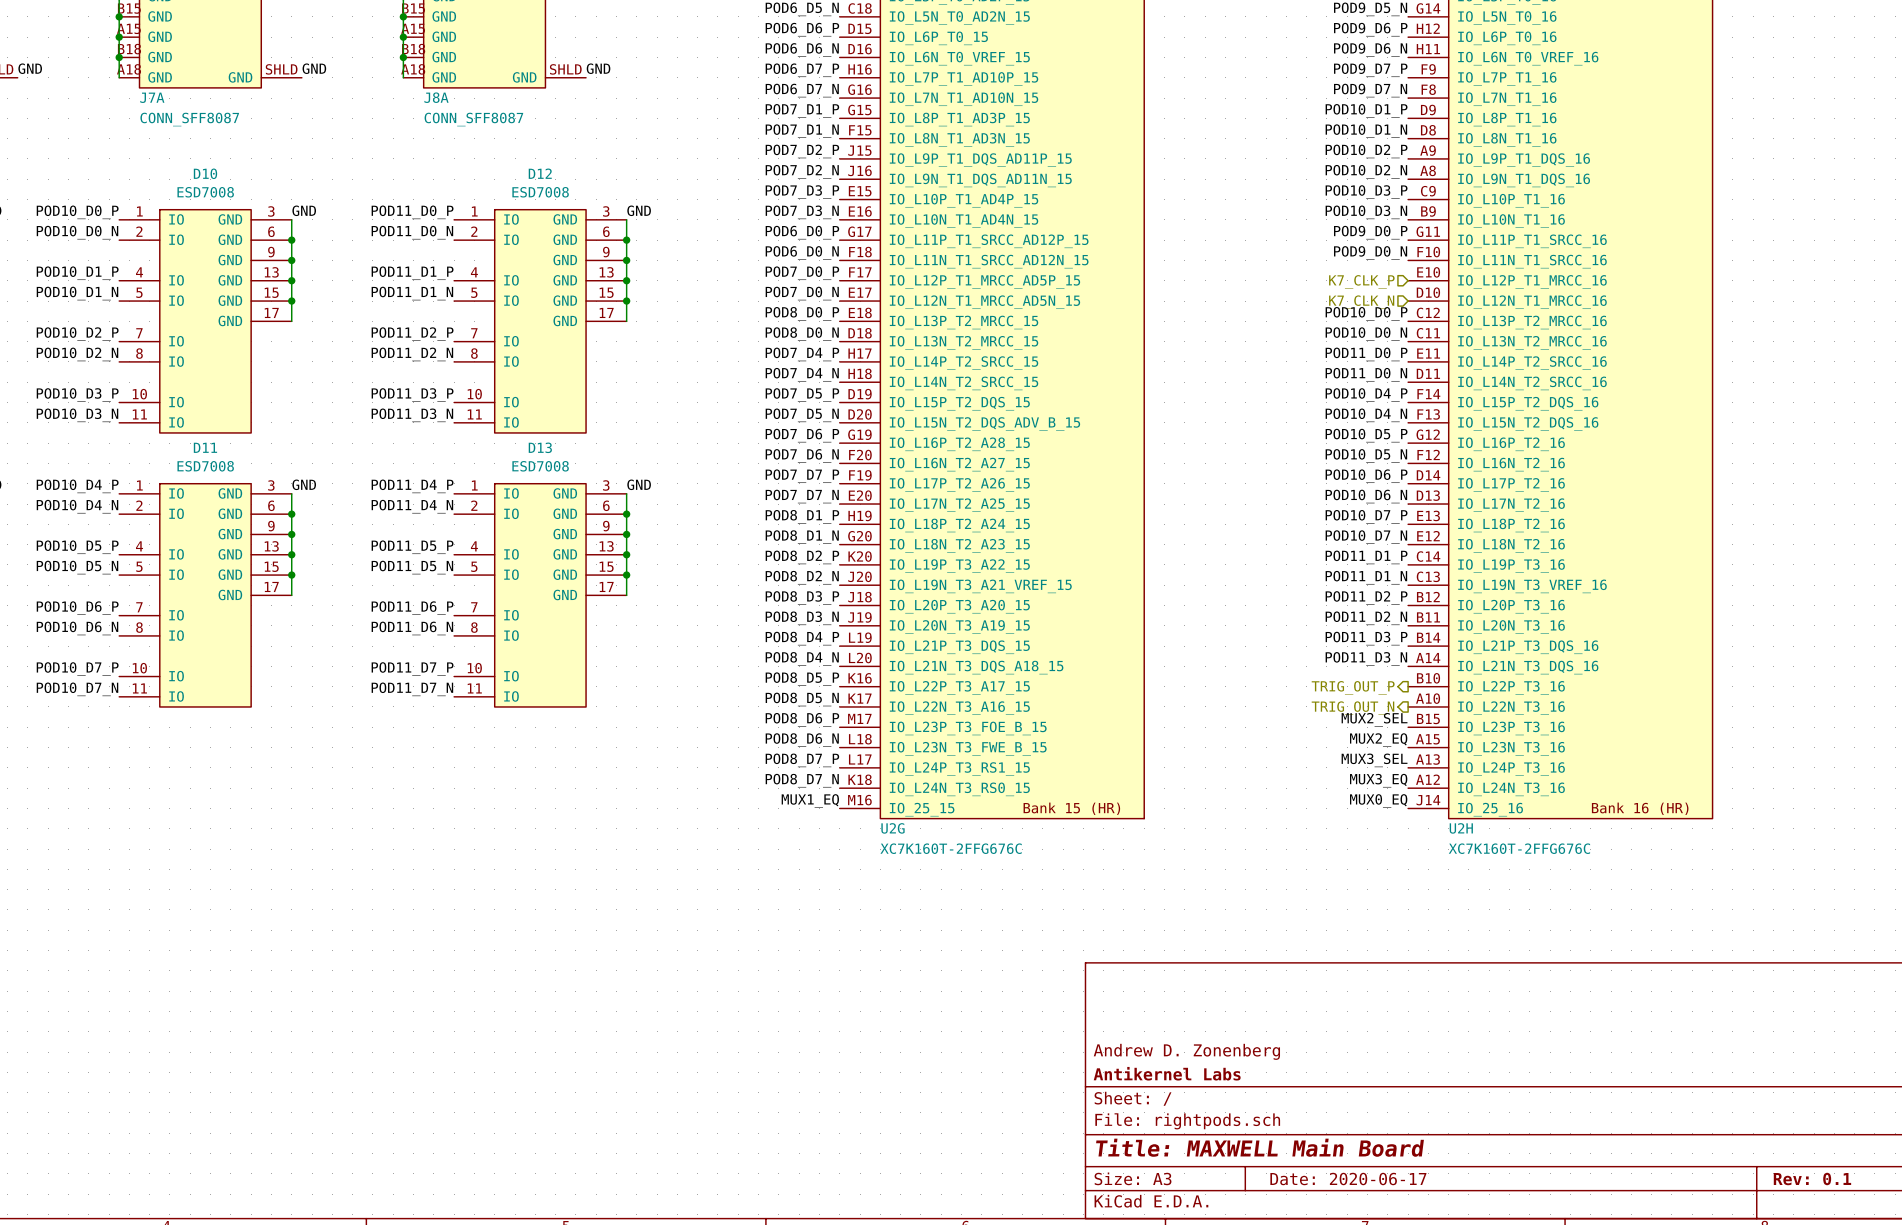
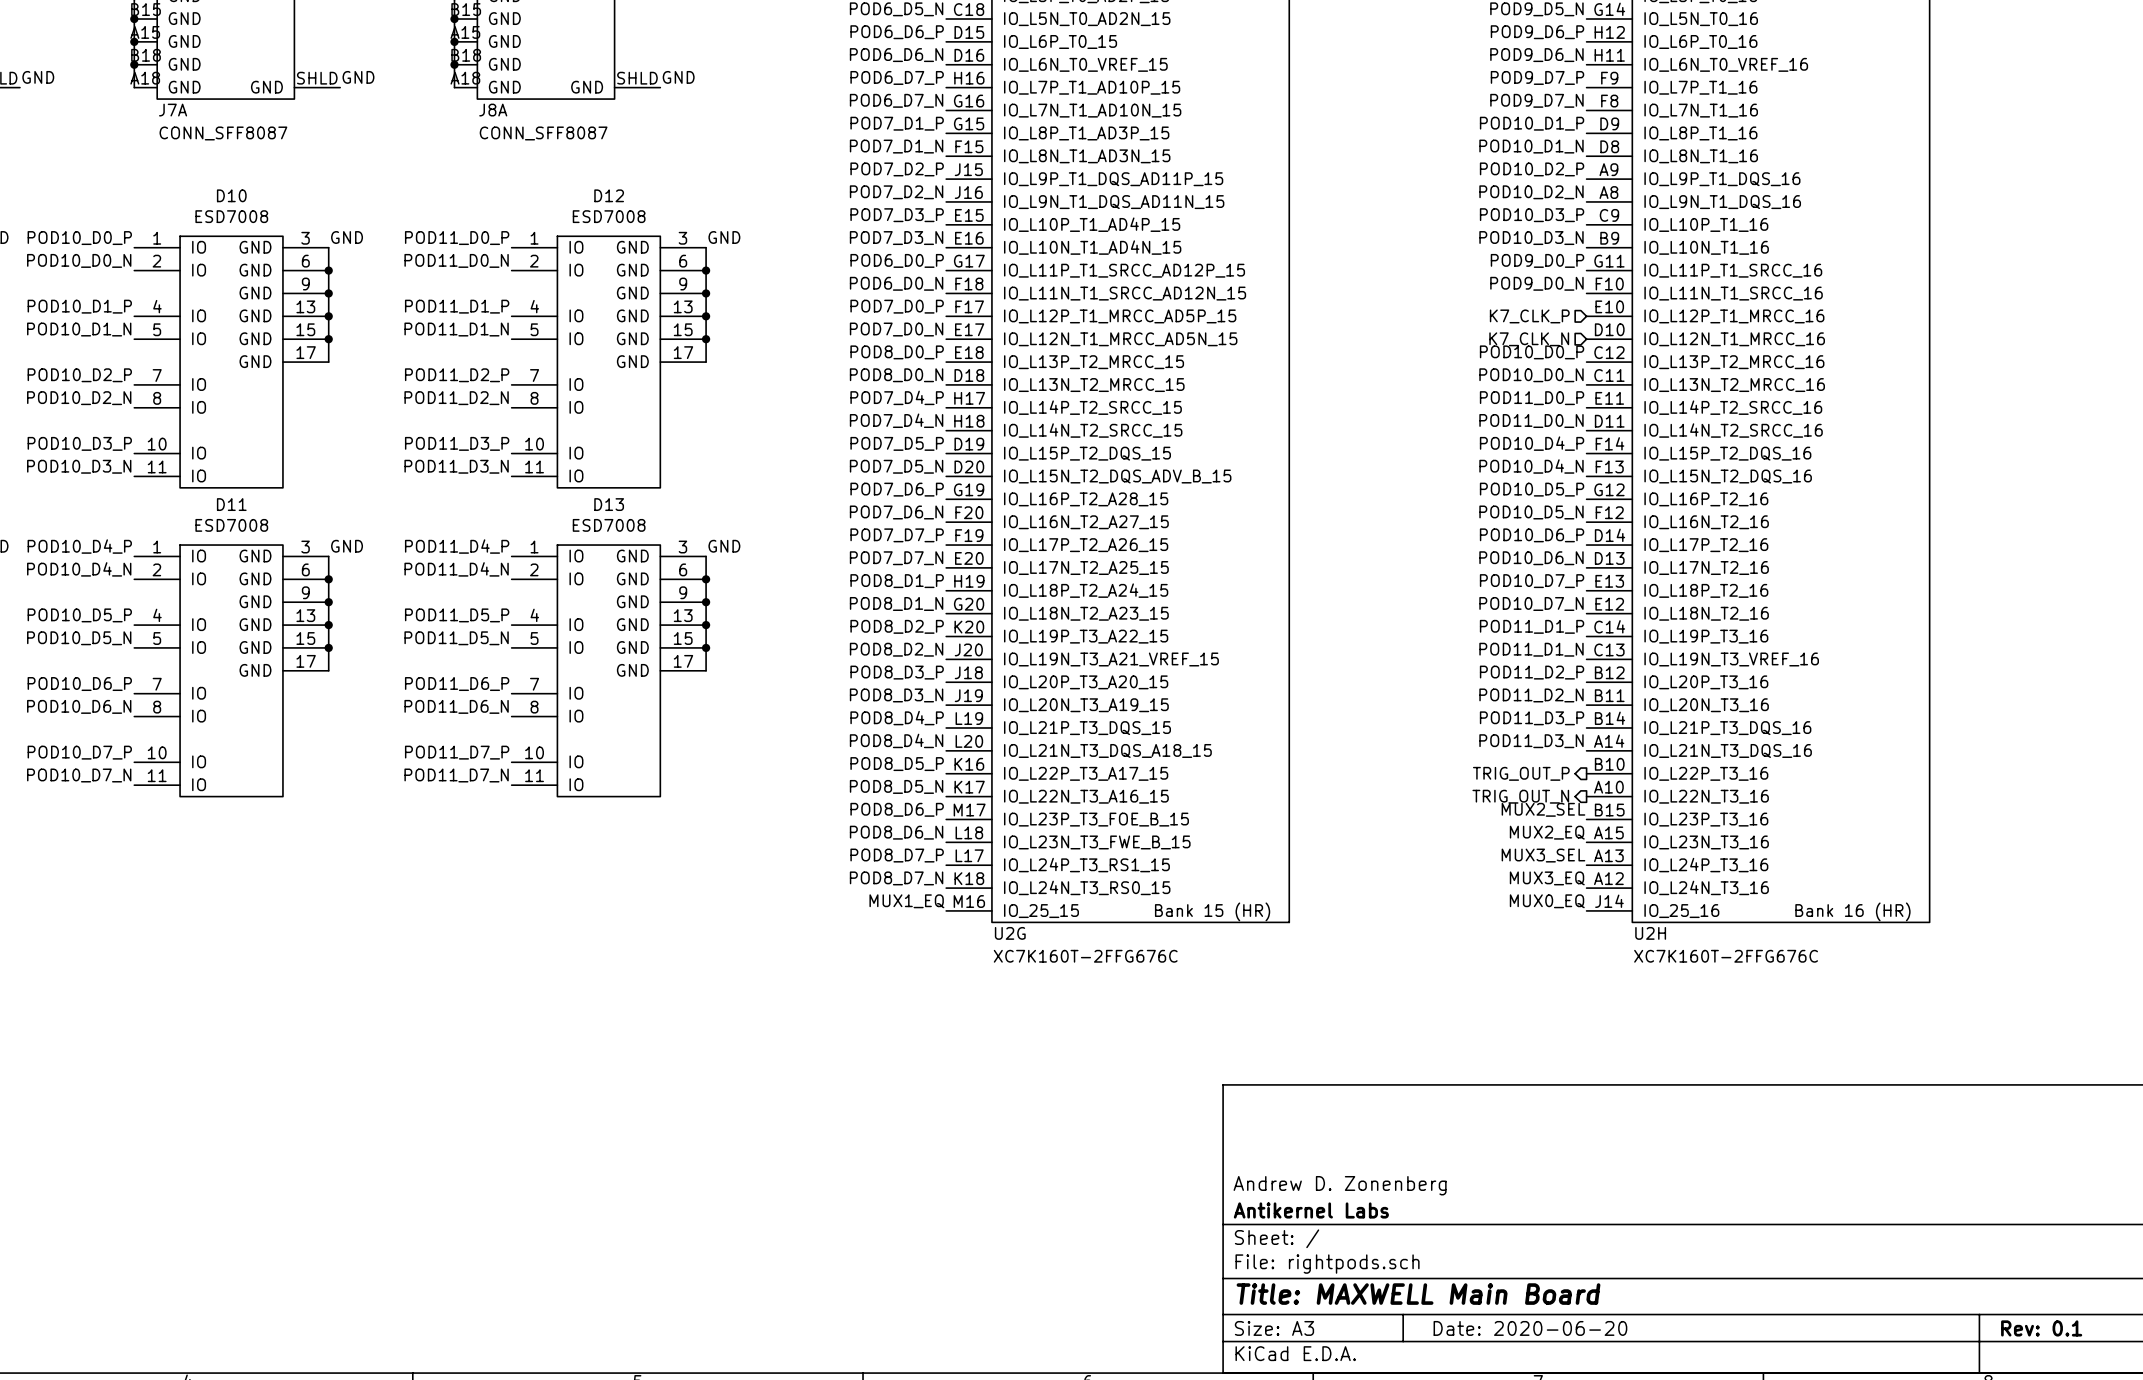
title block: Date: 2020-06-17 (1348, 1179) -> Date: 2020-06-20 (1530, 1328)

